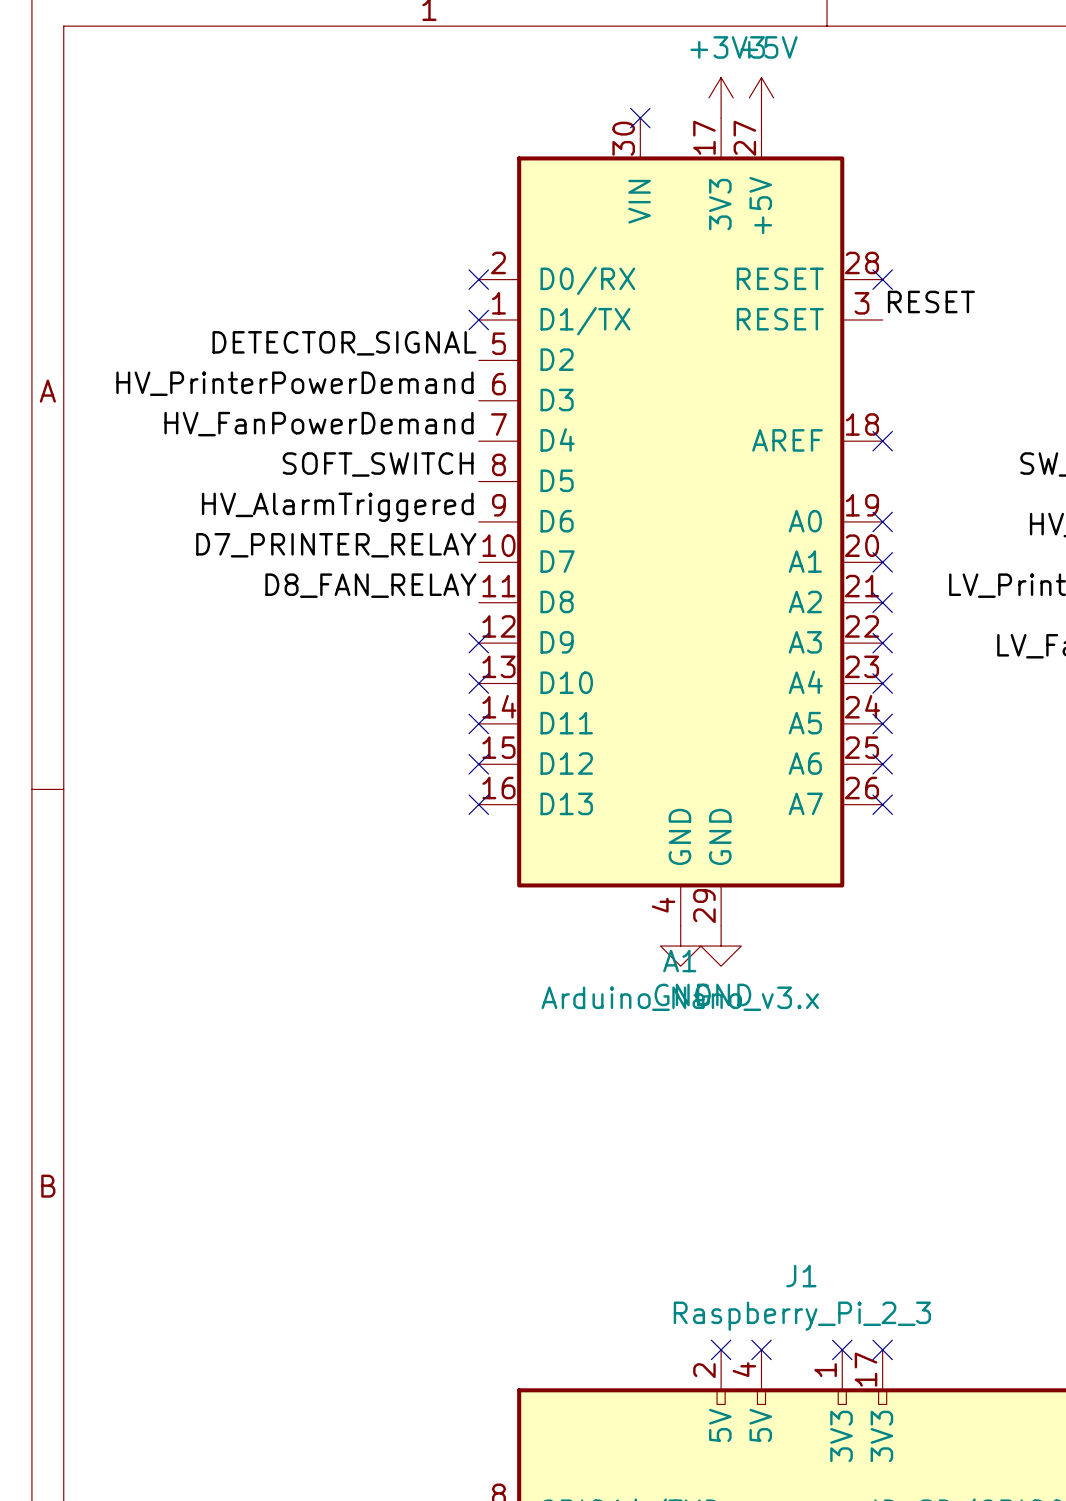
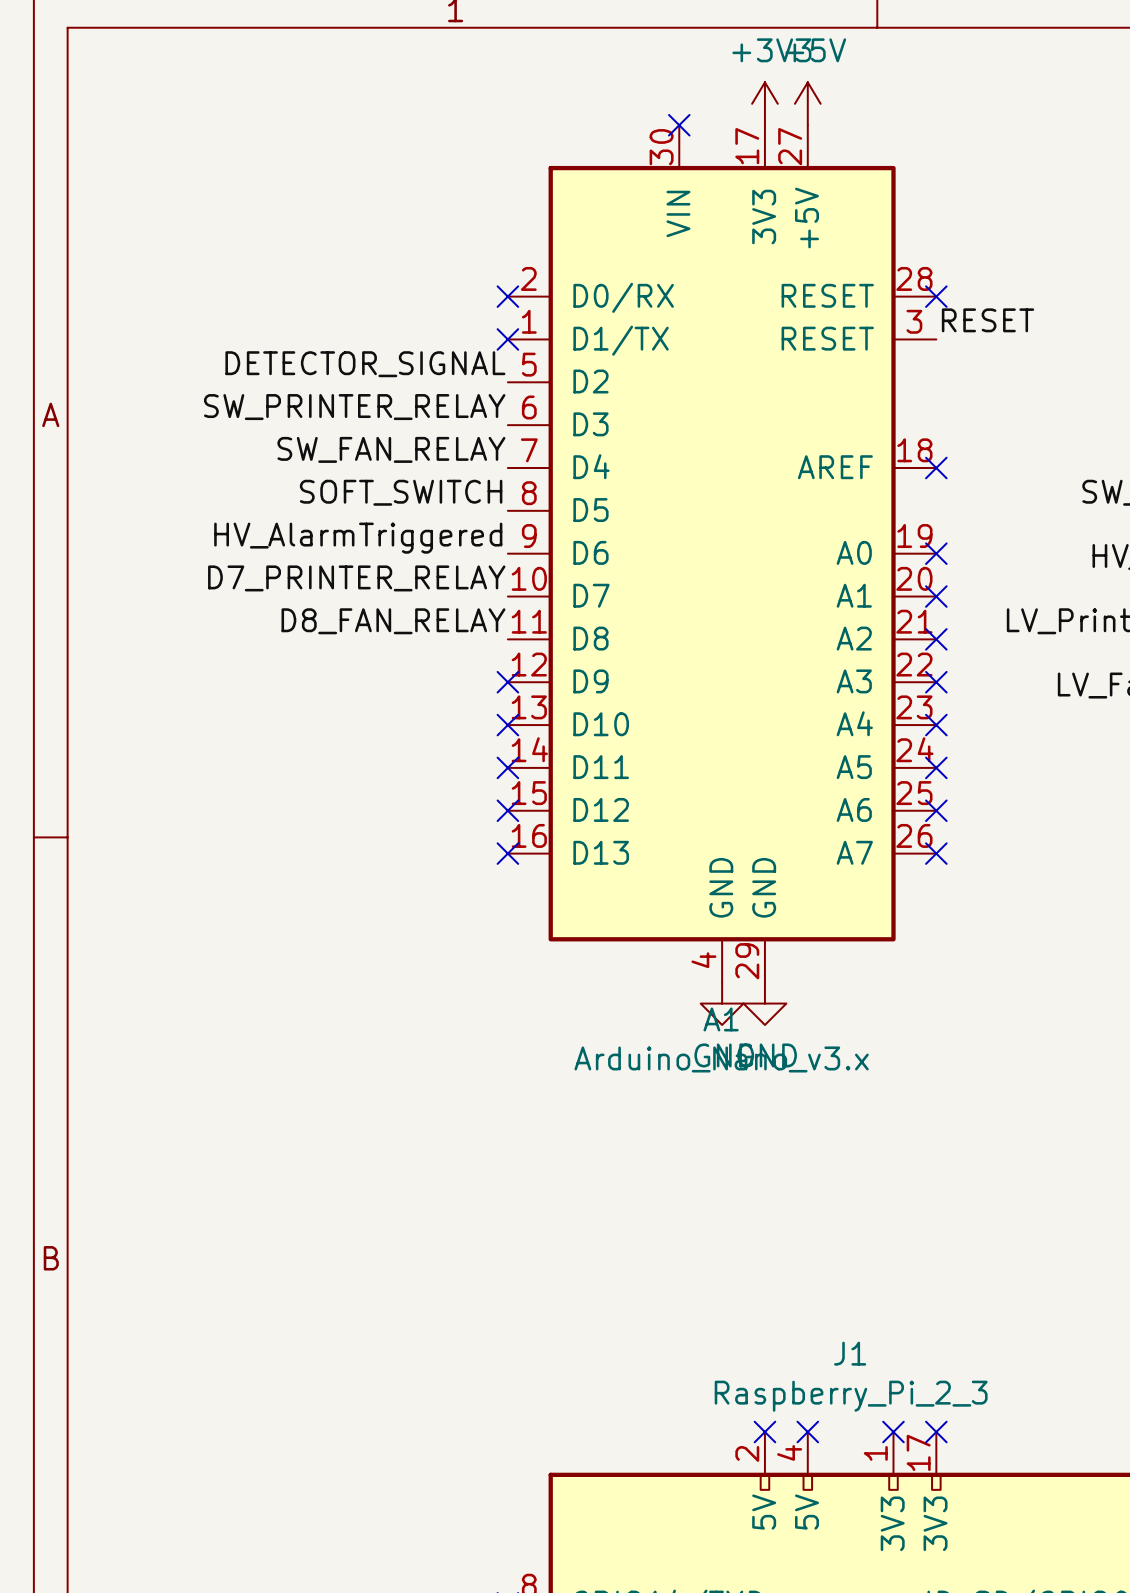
label: HV_PrinterPowerDemand (294, 383) -> SW_PRINTER_RELAY (354, 407)
label: HV_FanPowerDemand (318, 424) -> SW_FAN_RELAY (391, 449)

